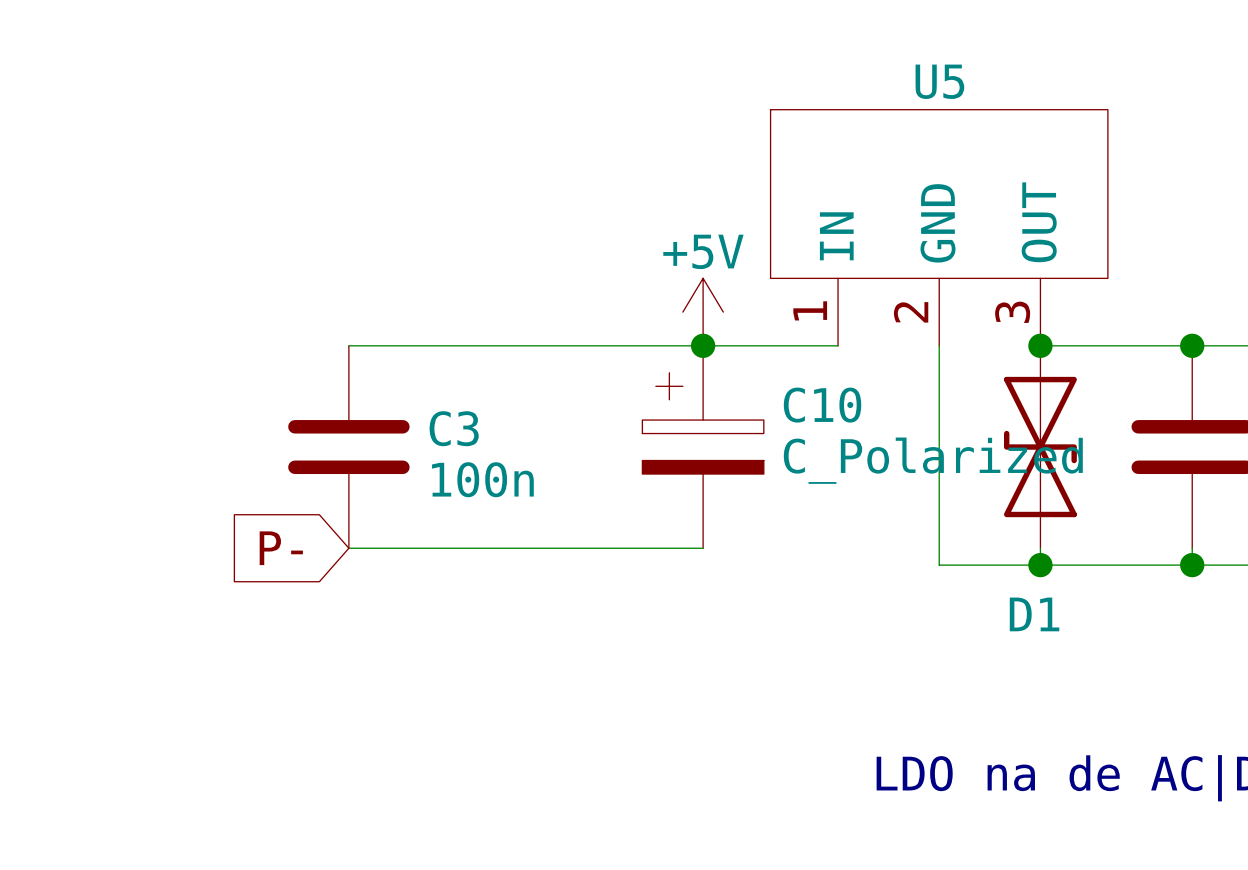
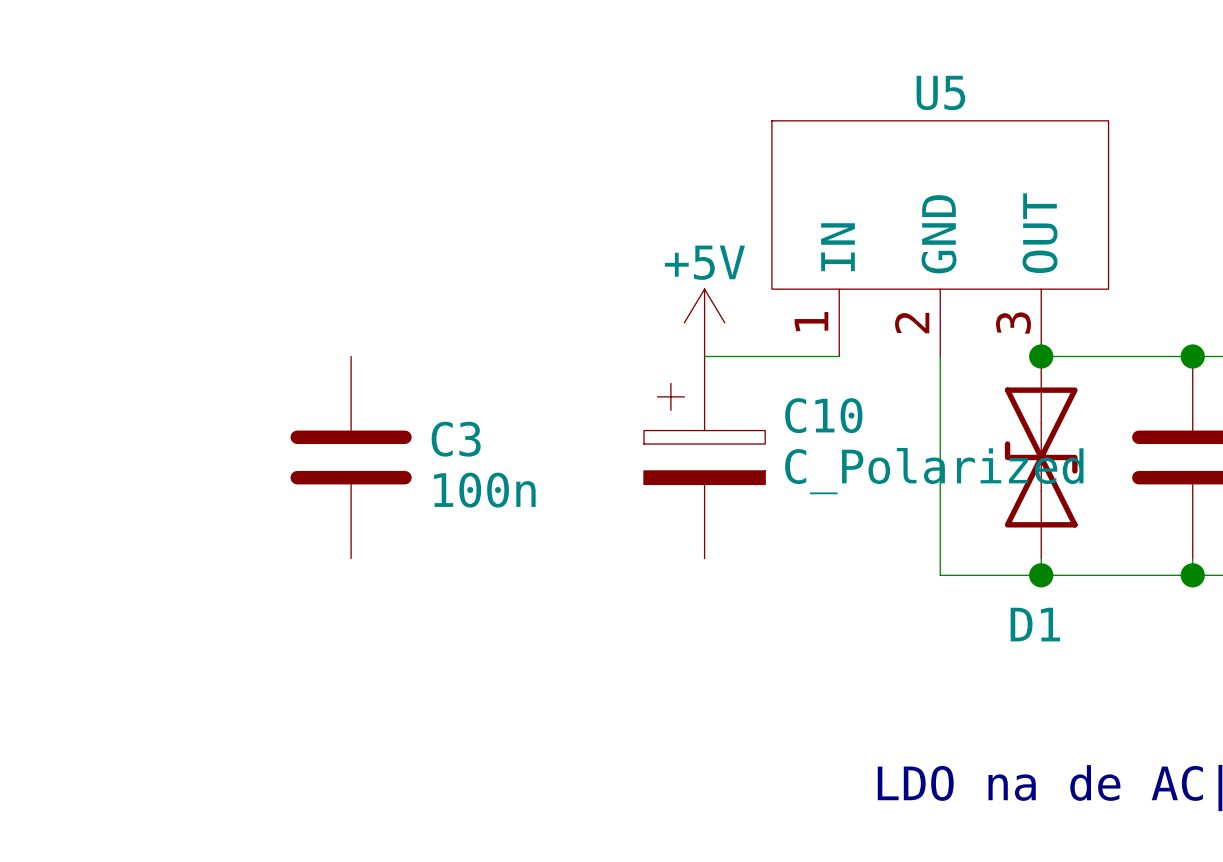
wire: (348, 345) (703, 345) -> none
junction: (703, 345) -> none
global label: P- (281, 548) -> none
wire: (348, 548) (703, 548) -> none

